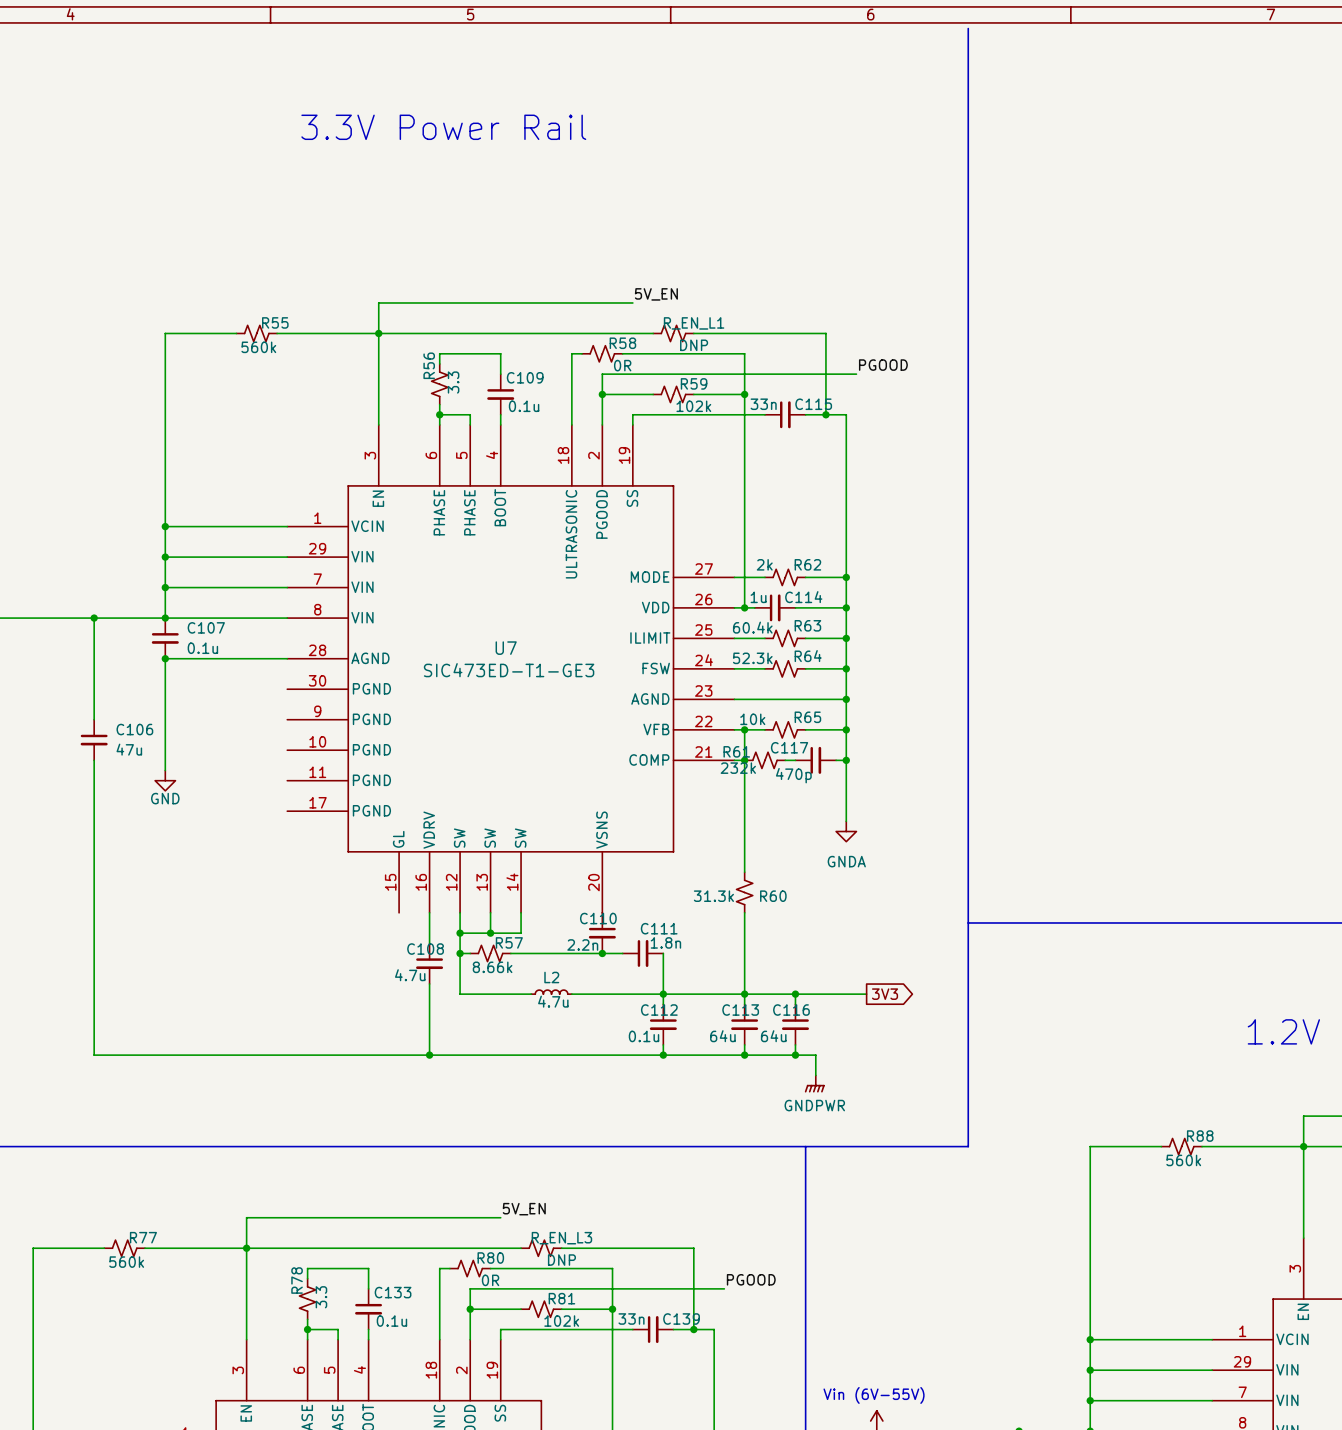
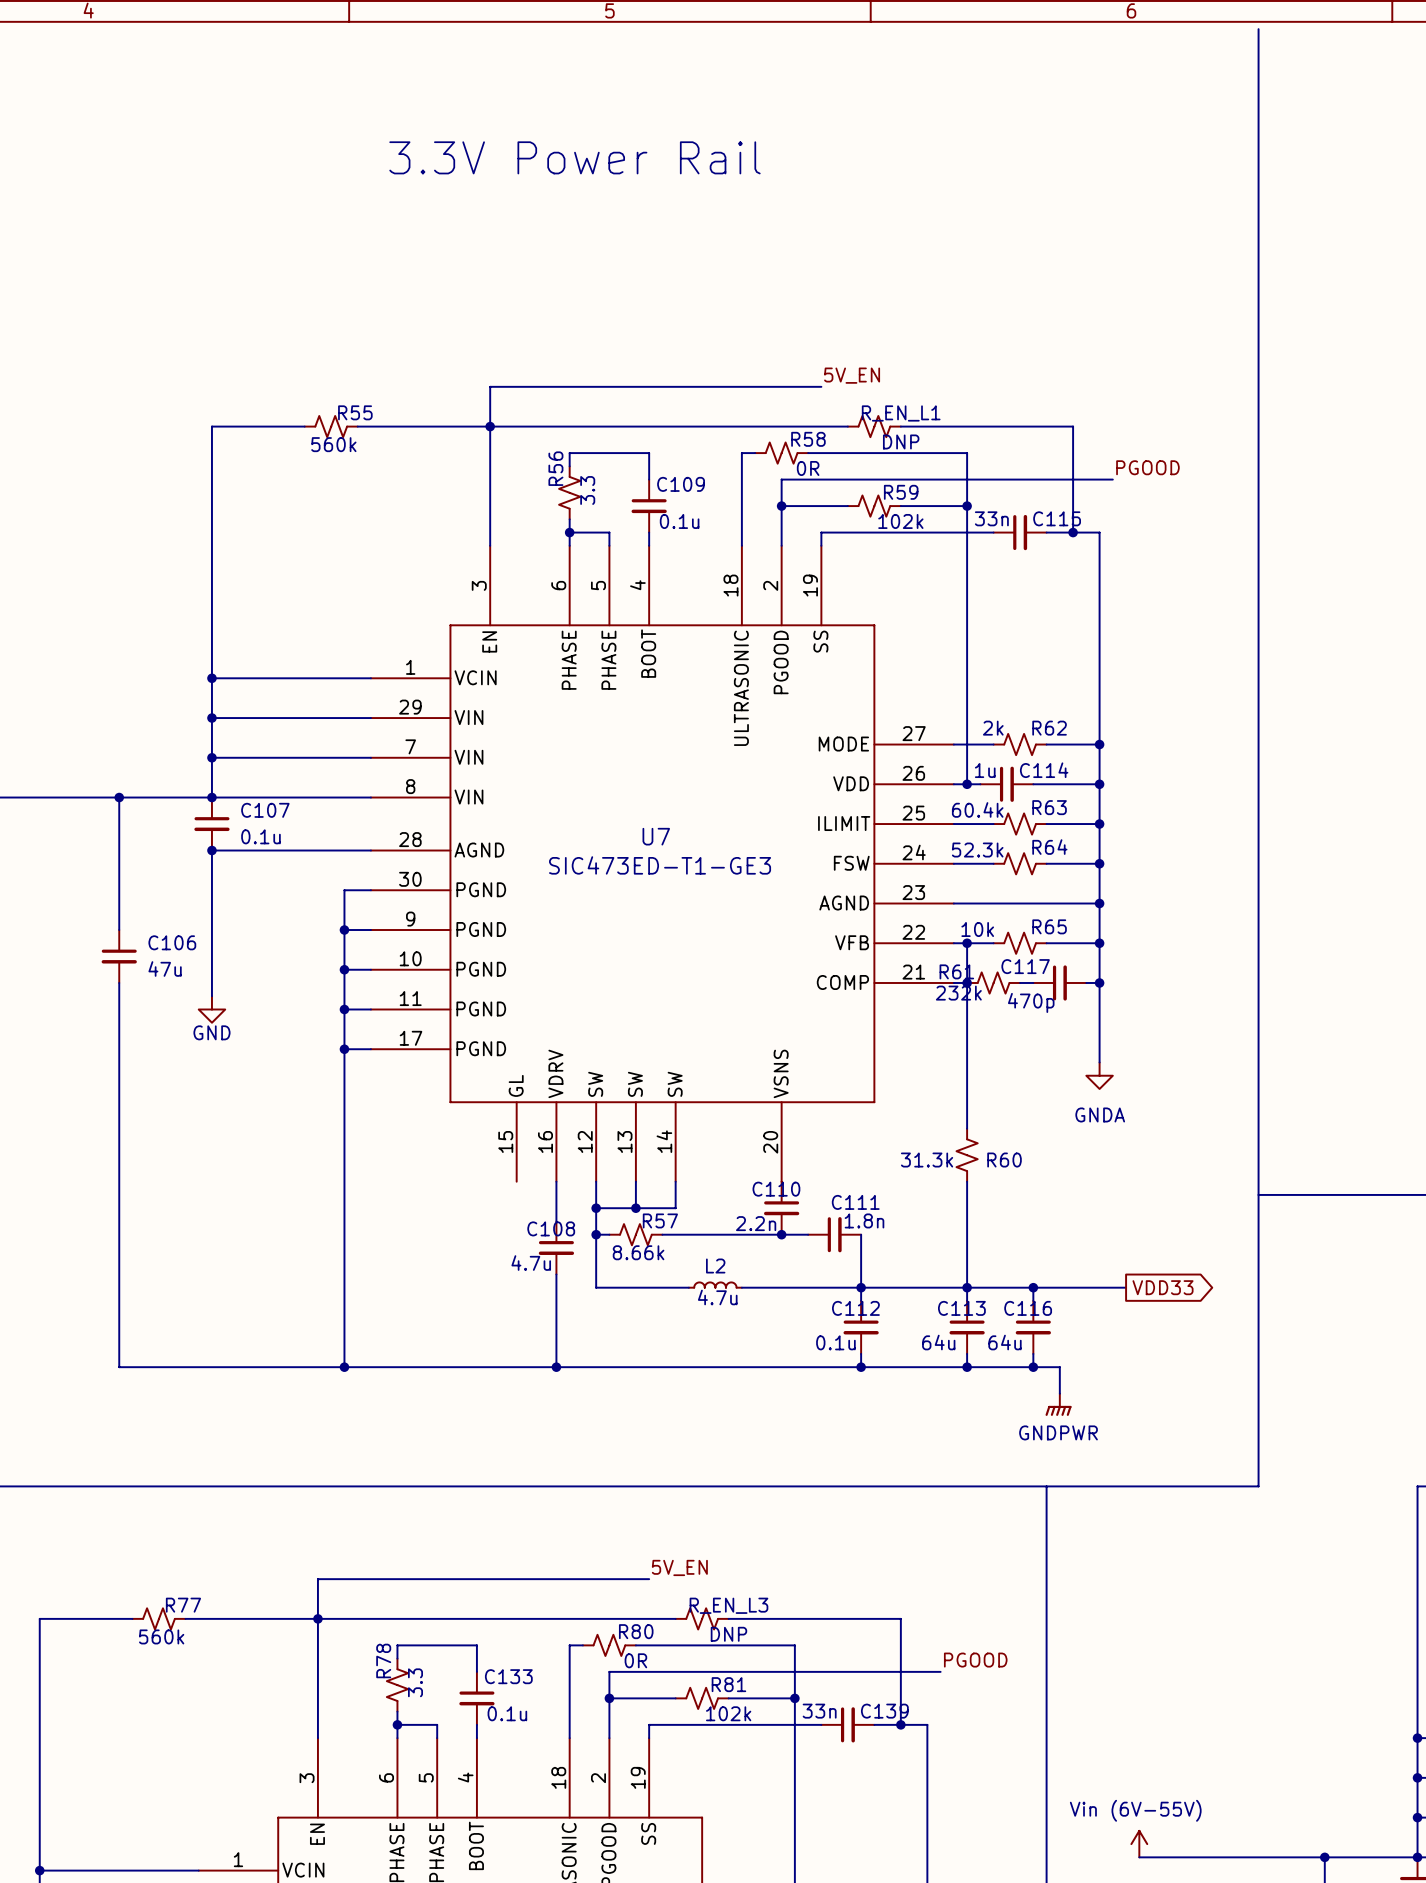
wire: none -> (370, 890) (344, 890) (344, 1367)
wire: none -> (344, 930) (370, 930)
junction: none -> (344, 930)
wire: none -> (344, 969) (370, 969)
junction: none -> (344, 969)
wire: none -> (344, 1009) (370, 1009)
junction: none -> (344, 1009)
wire: none -> (344, 1049) (370, 1049)
junction: none -> (344, 1049)
global label: 3V3 (885, 994) -> VDD33 (1163, 1287)
junction: none -> (344, 1367)

